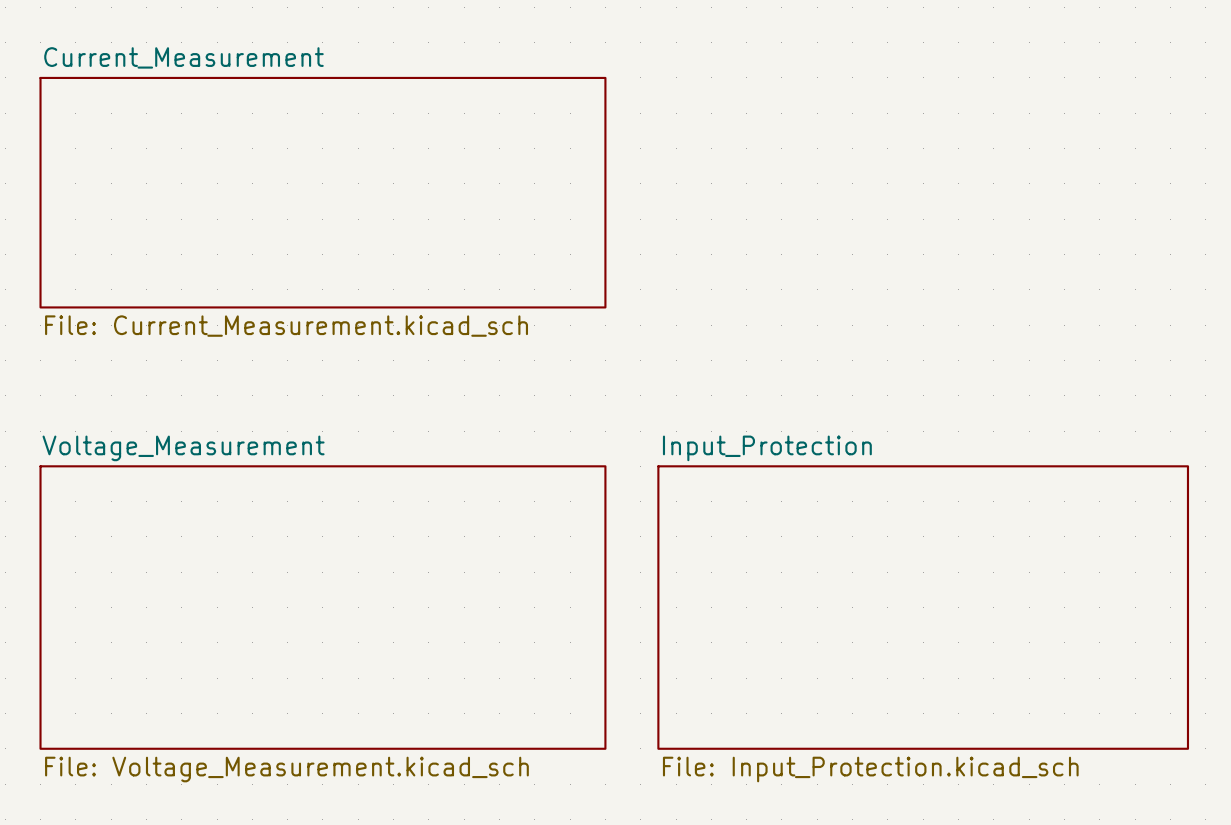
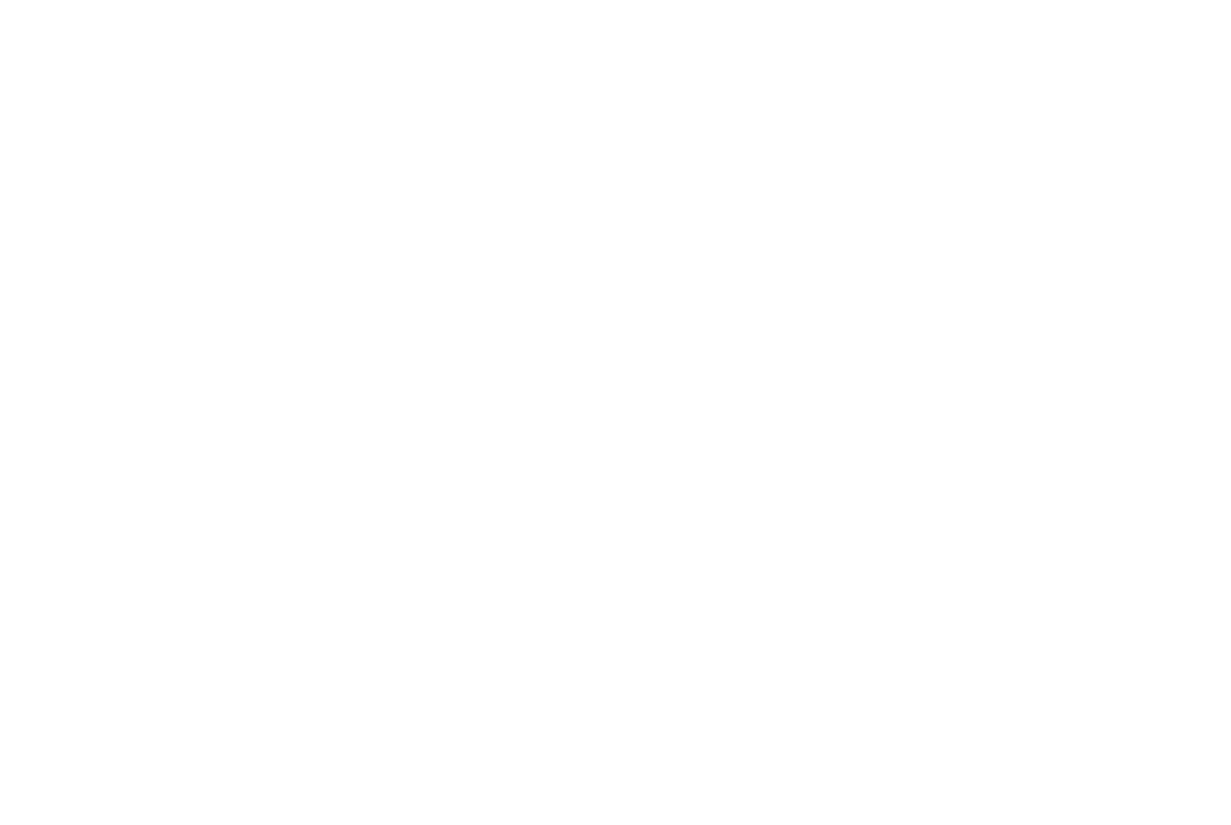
sheet Current_Measurement: File: Current_Measurement.kicad_sch (322, 192) -> none
sheet Voltage_Measurement: File: Voltage_Measurement.kicad_sch (322, 607) -> none
sheet Input_Protection: File: Input_Protection.kicad_sch (923, 607) -> none

